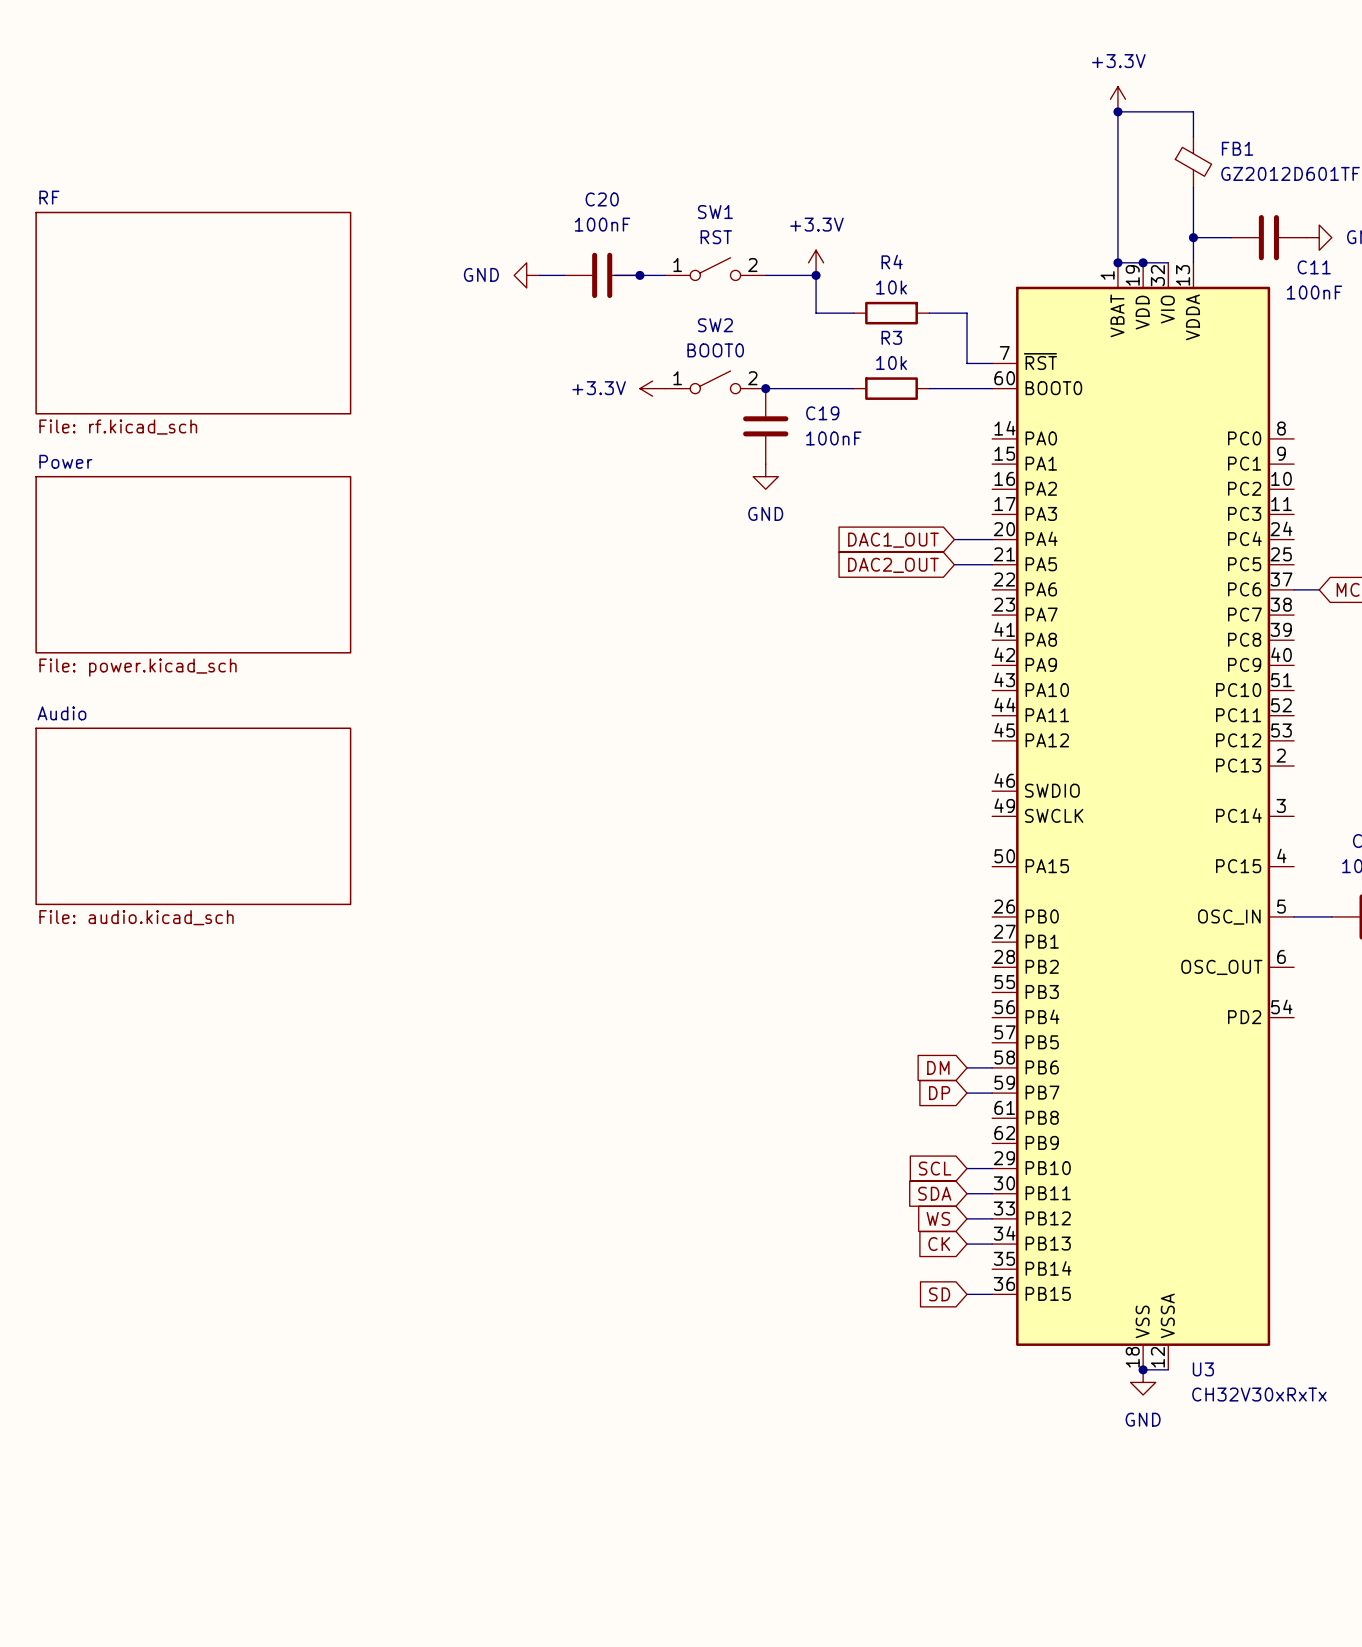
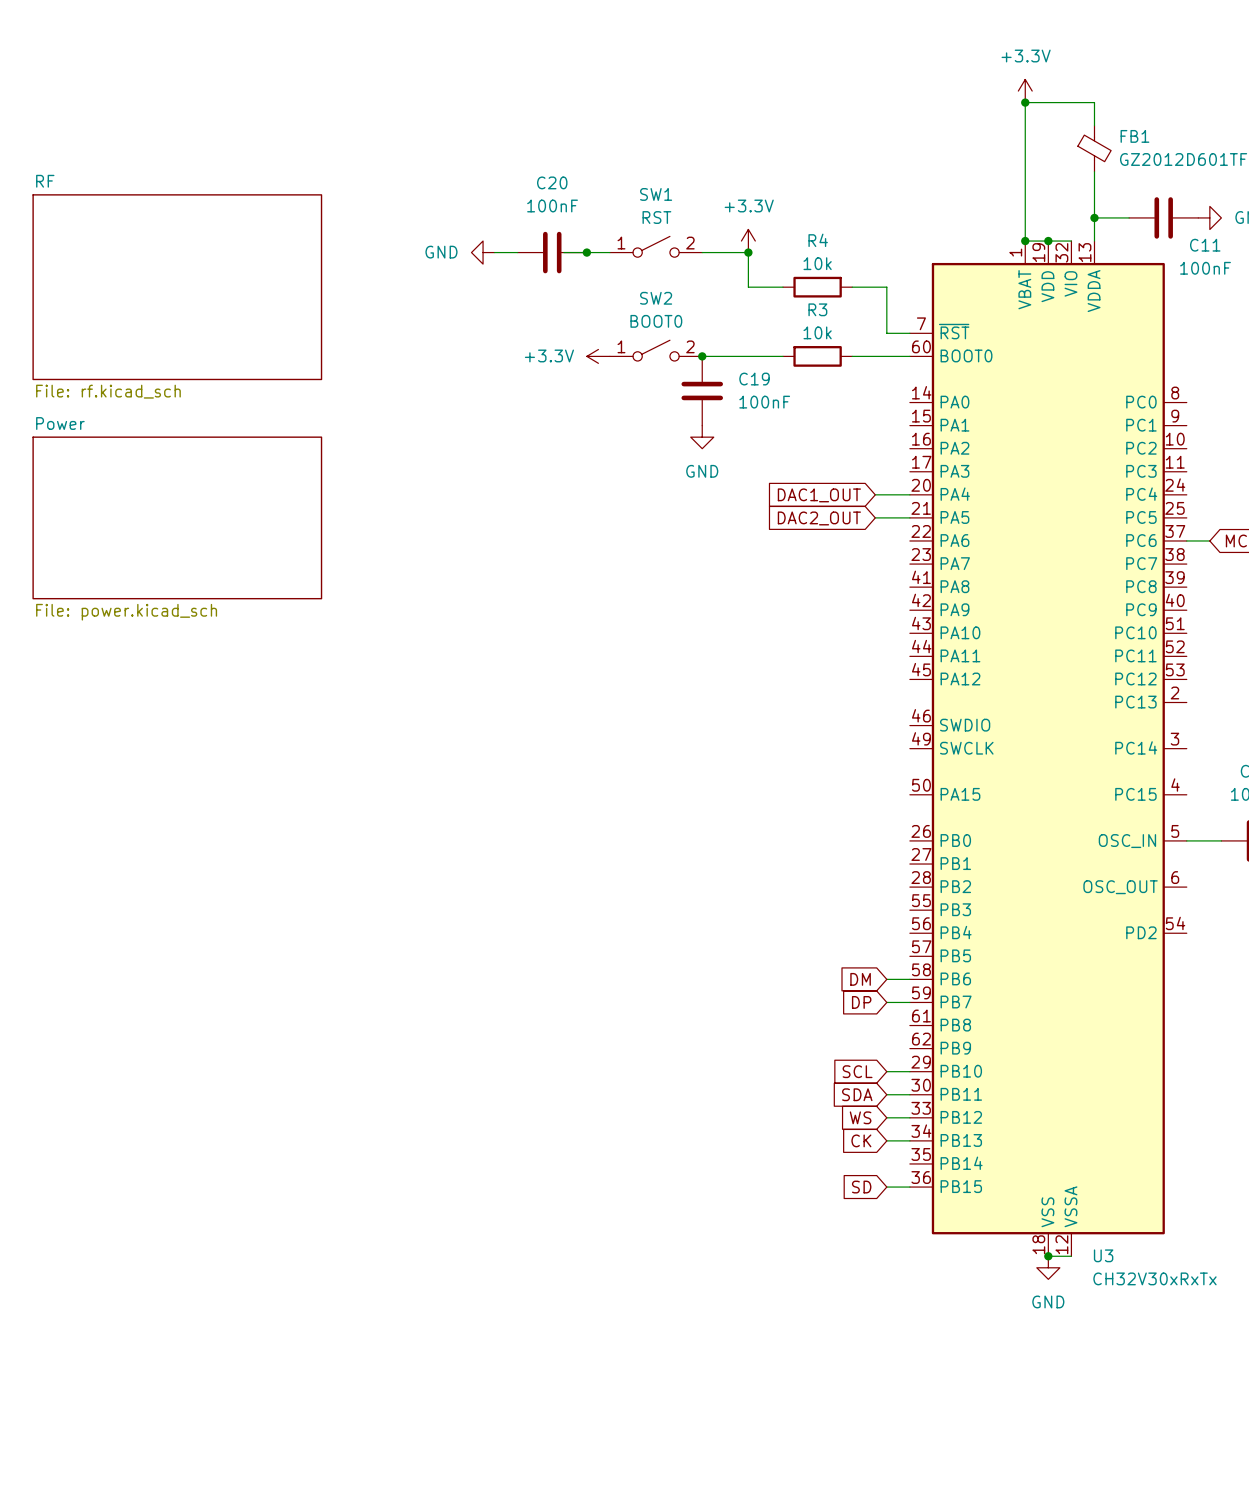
sheet Audio: File: audio.kicad_sch (193, 816) -> none

